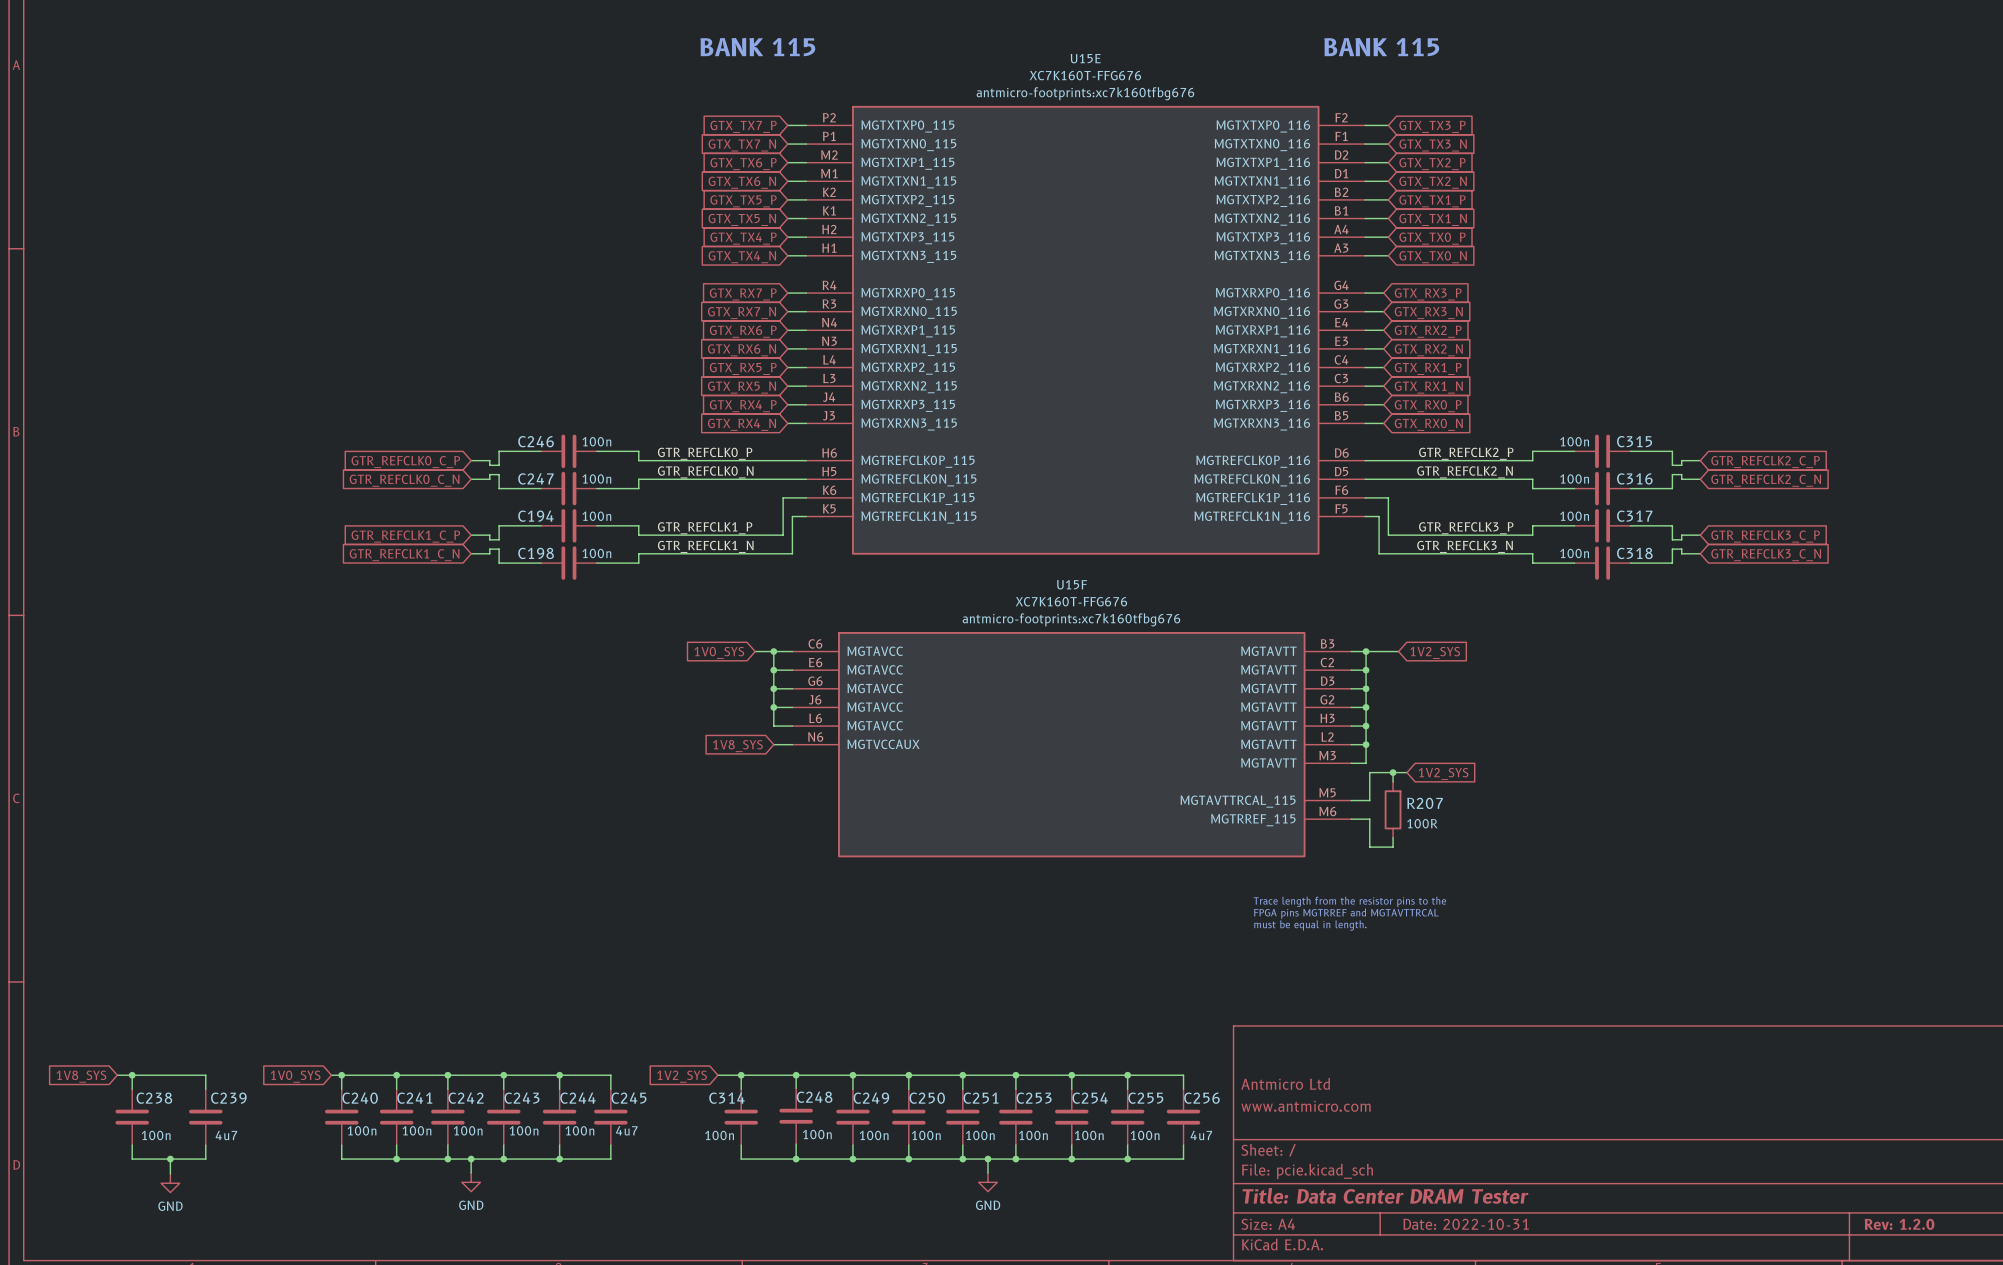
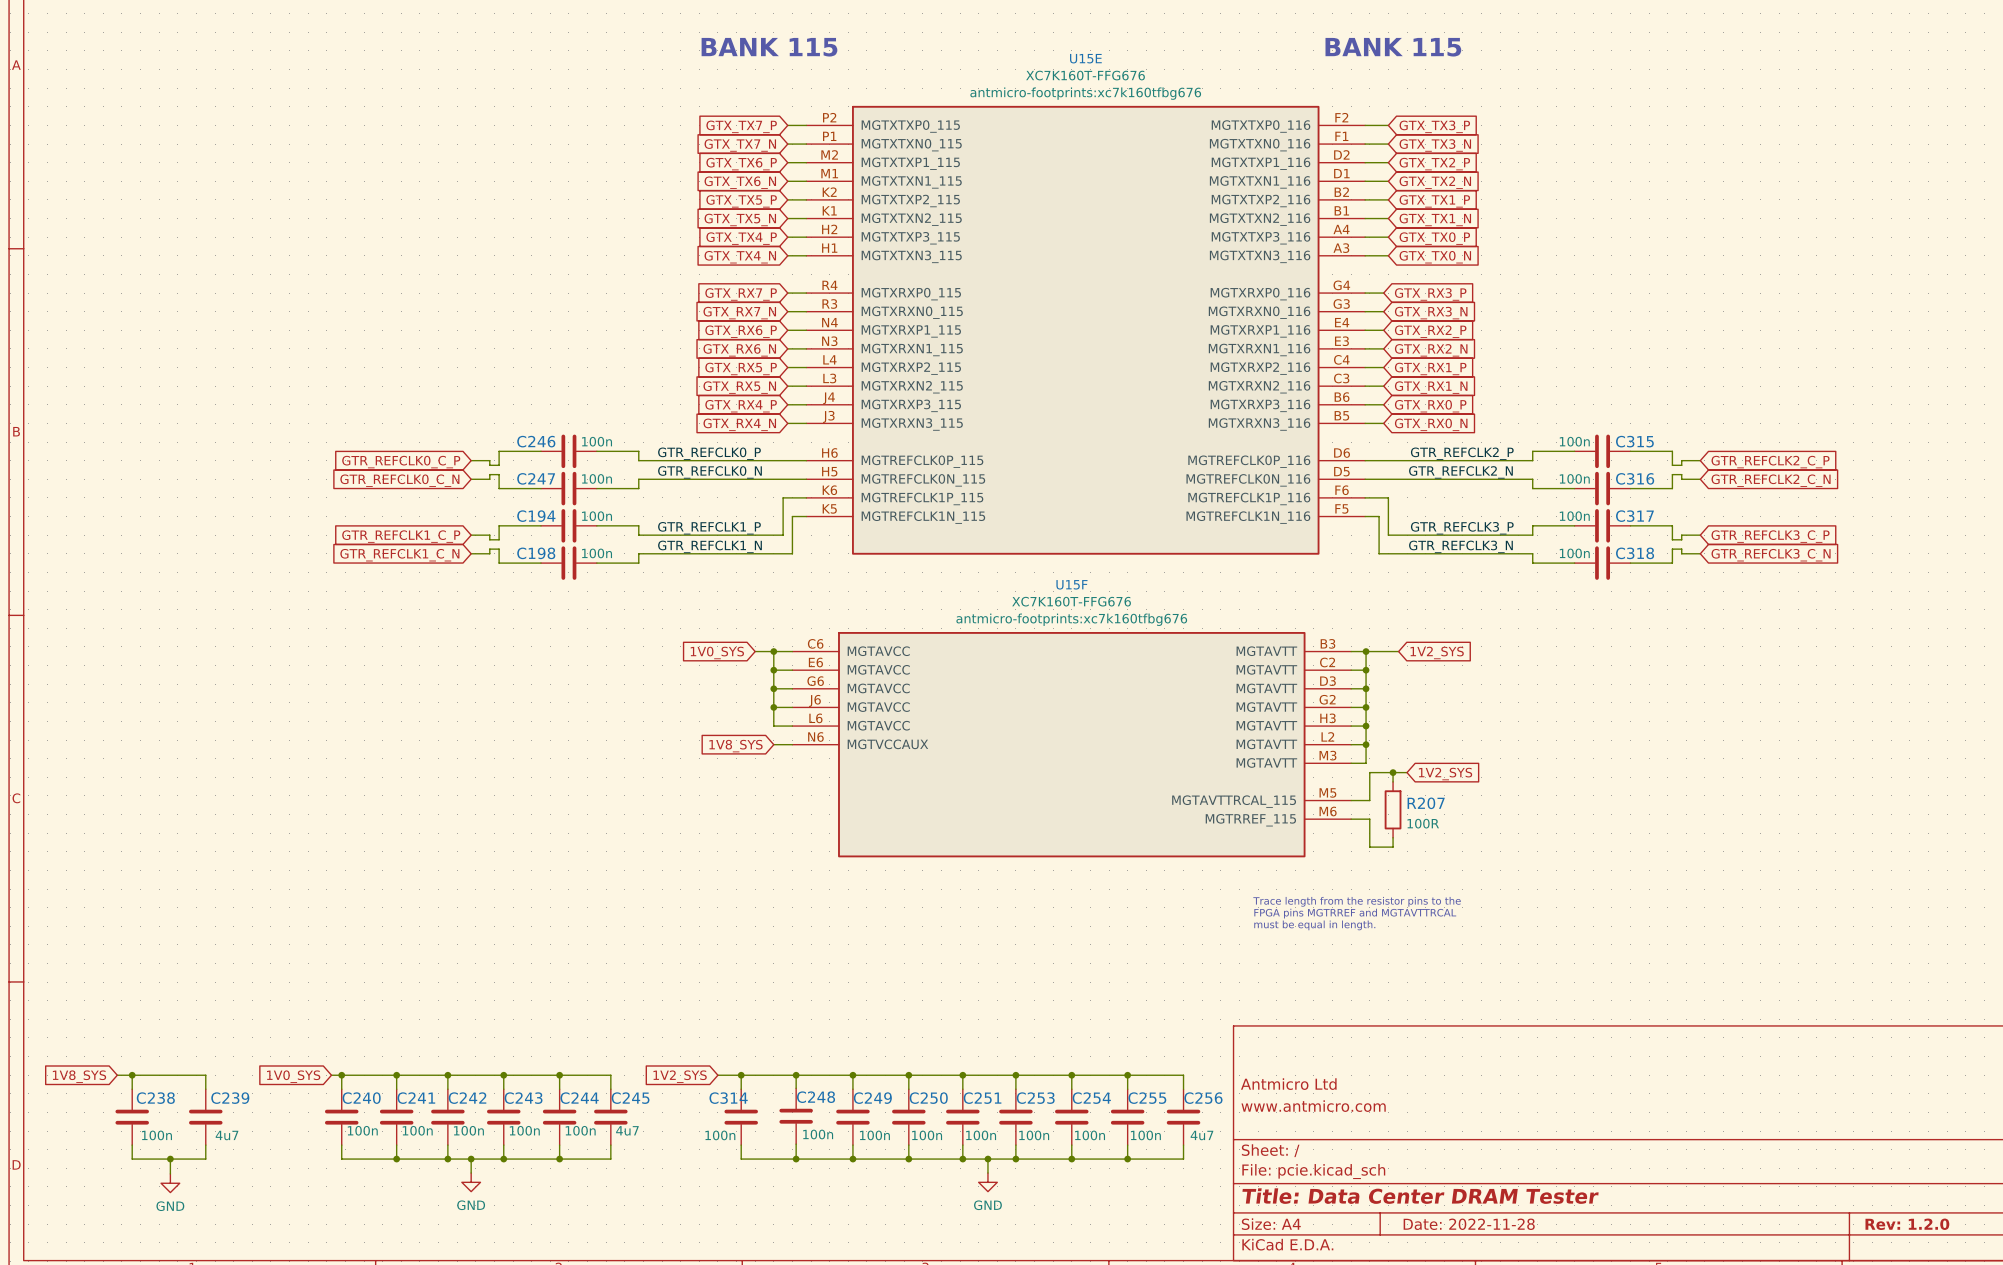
title block: Date: 2022-10-31 (1466, 1224) -> Date: 2022-11-28 (1469, 1224)

